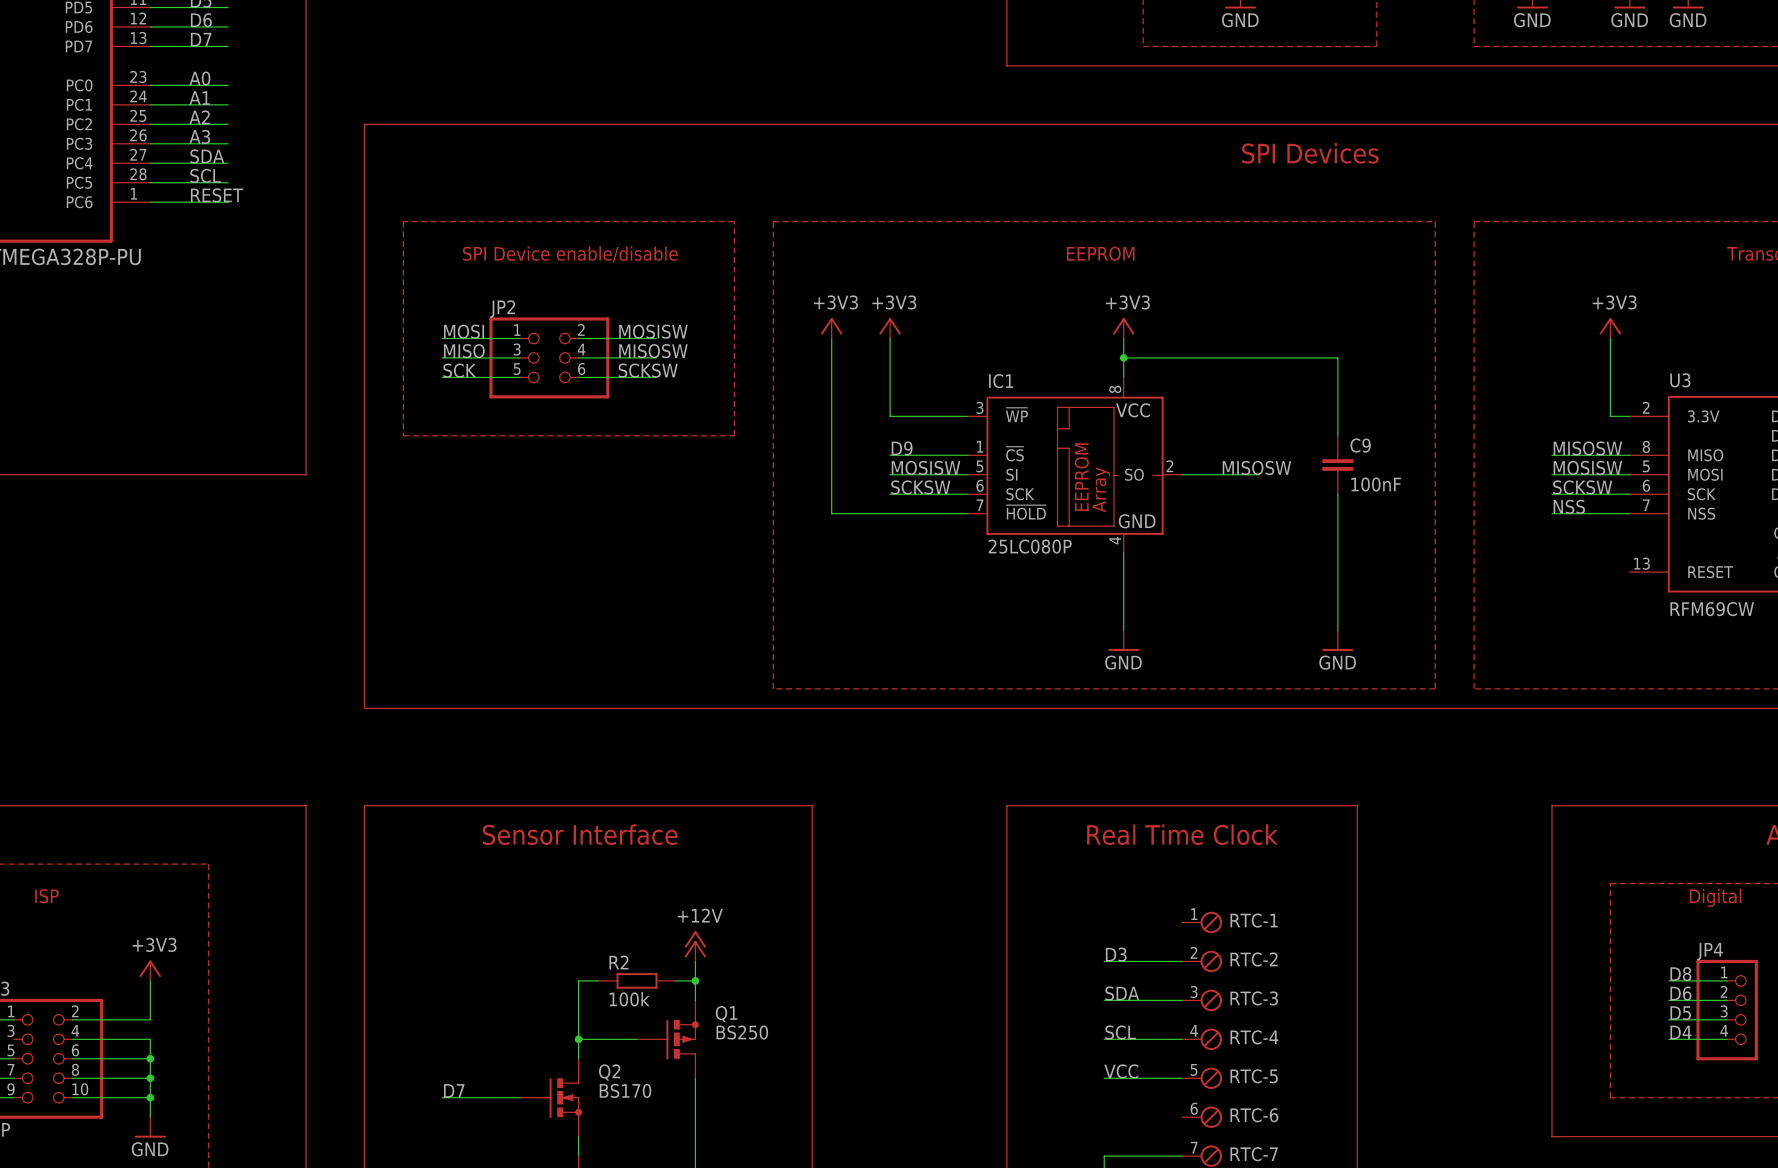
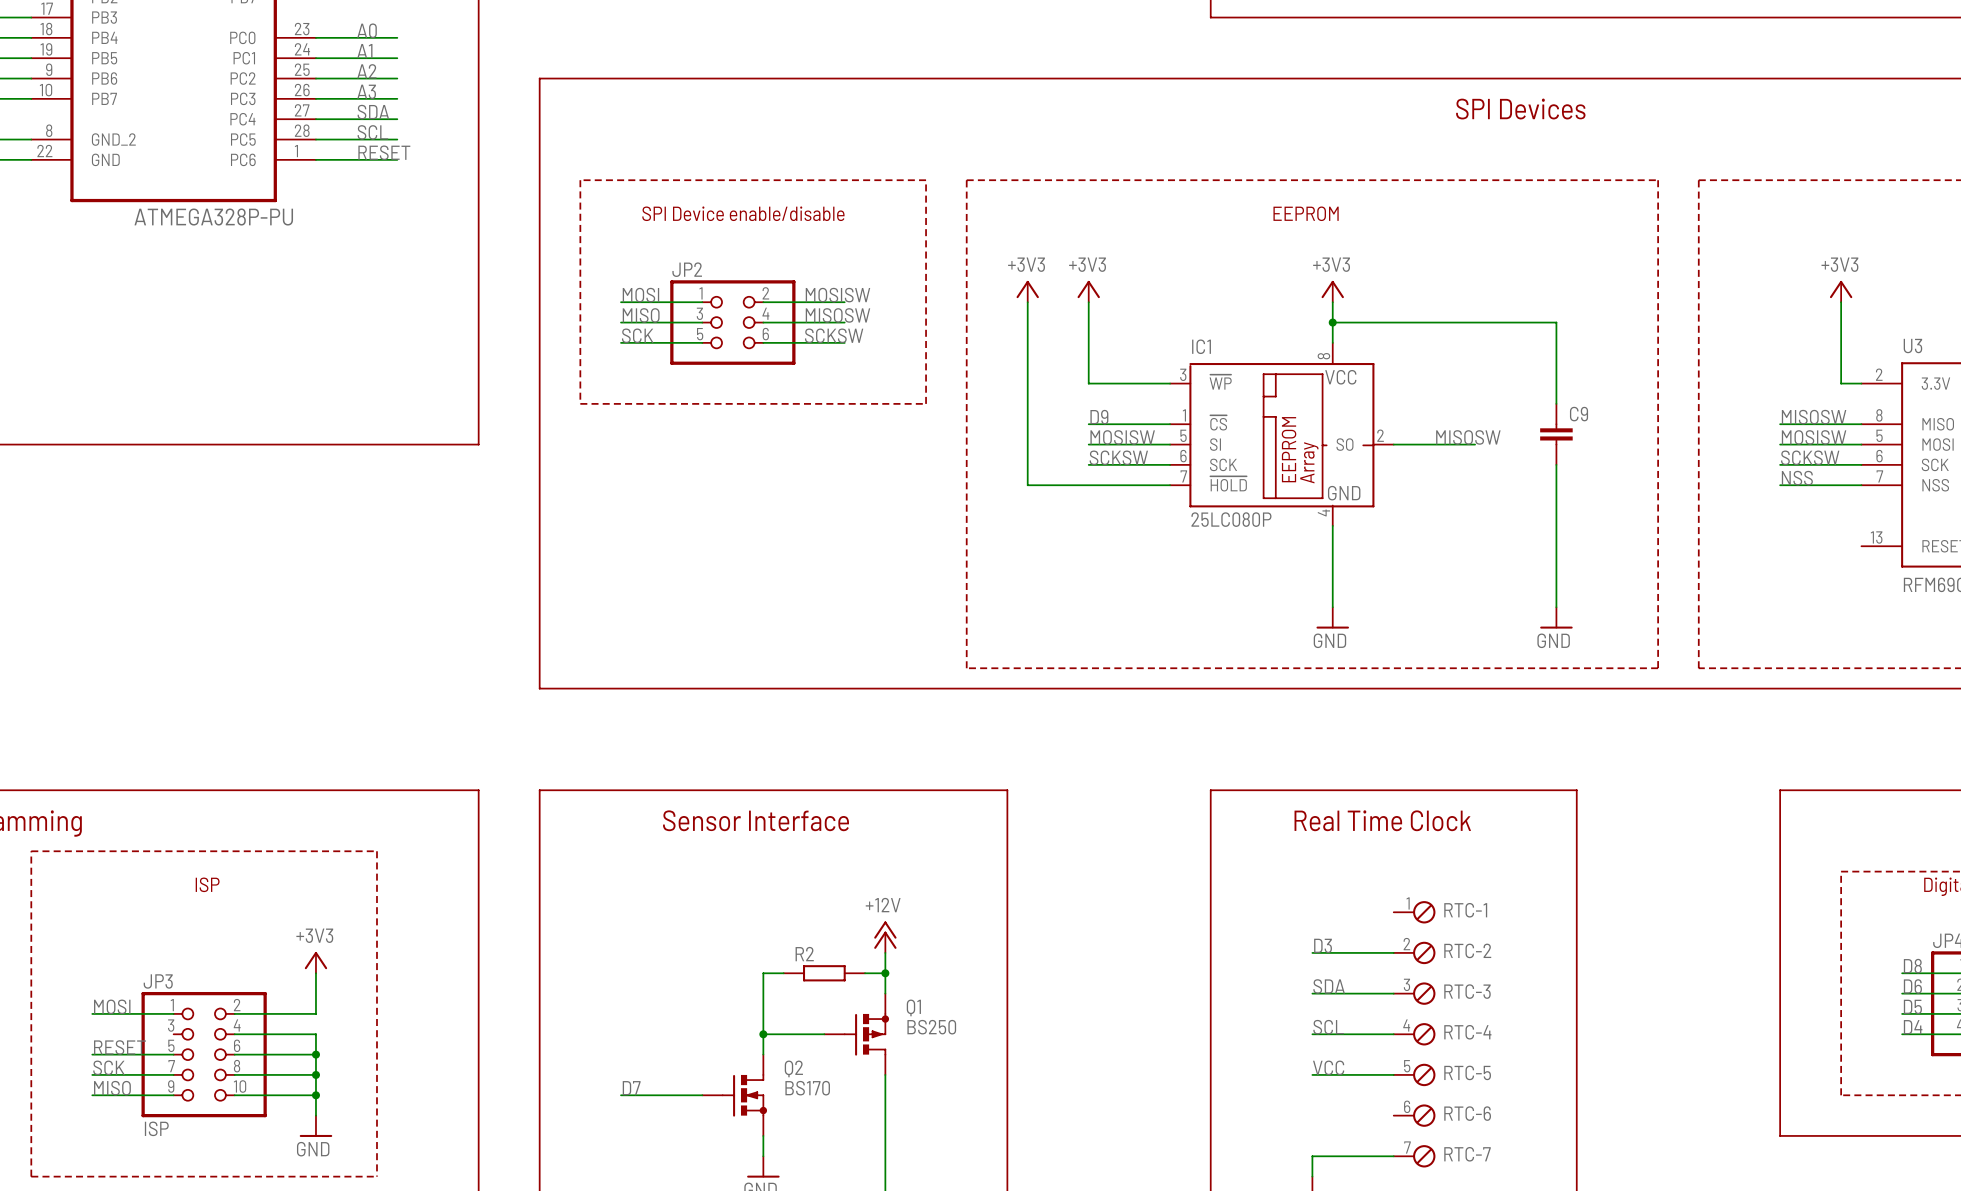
C9 value: 100nF (1376, 484) -> none
R2 value: 100k (629, 999) -> none

